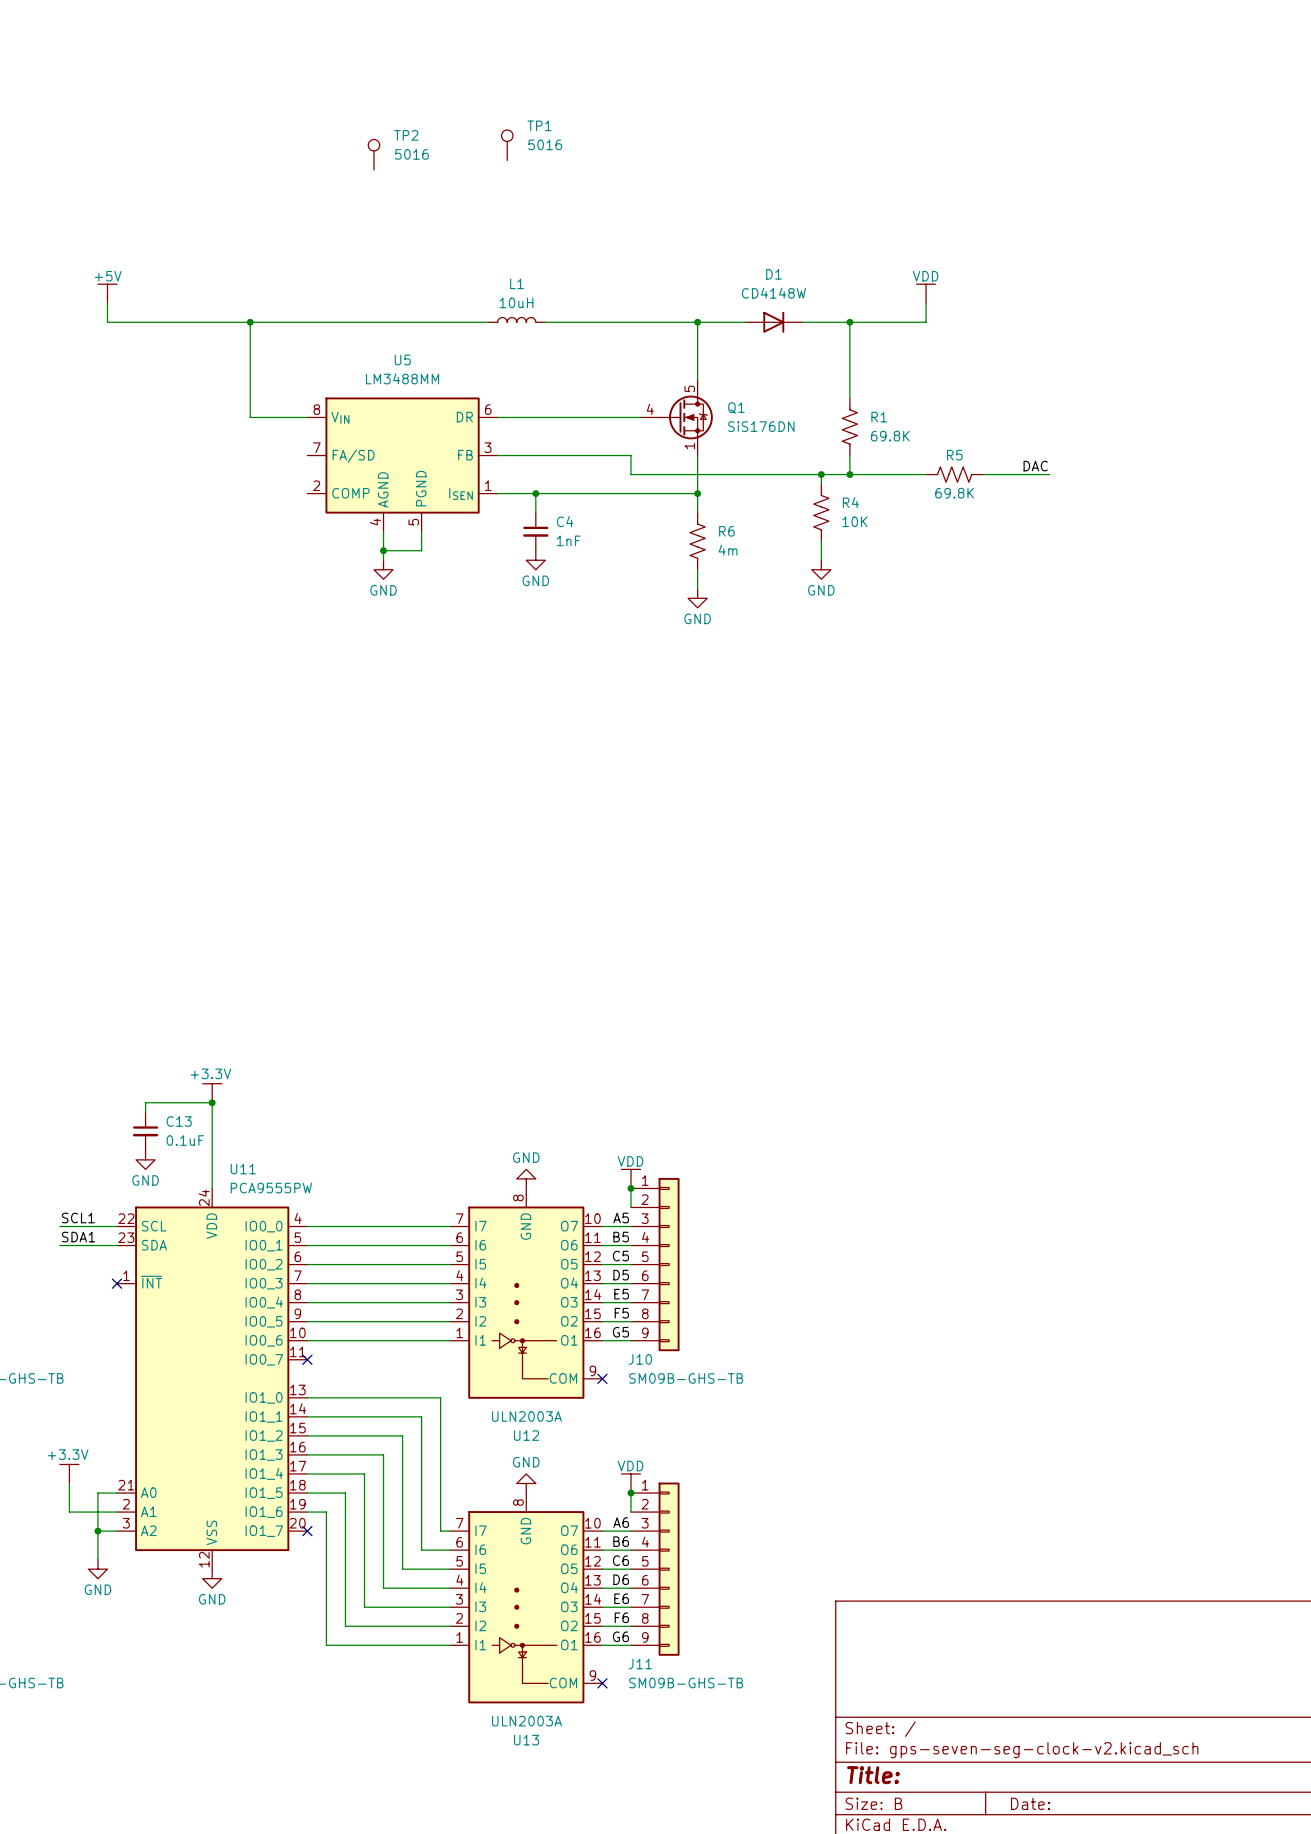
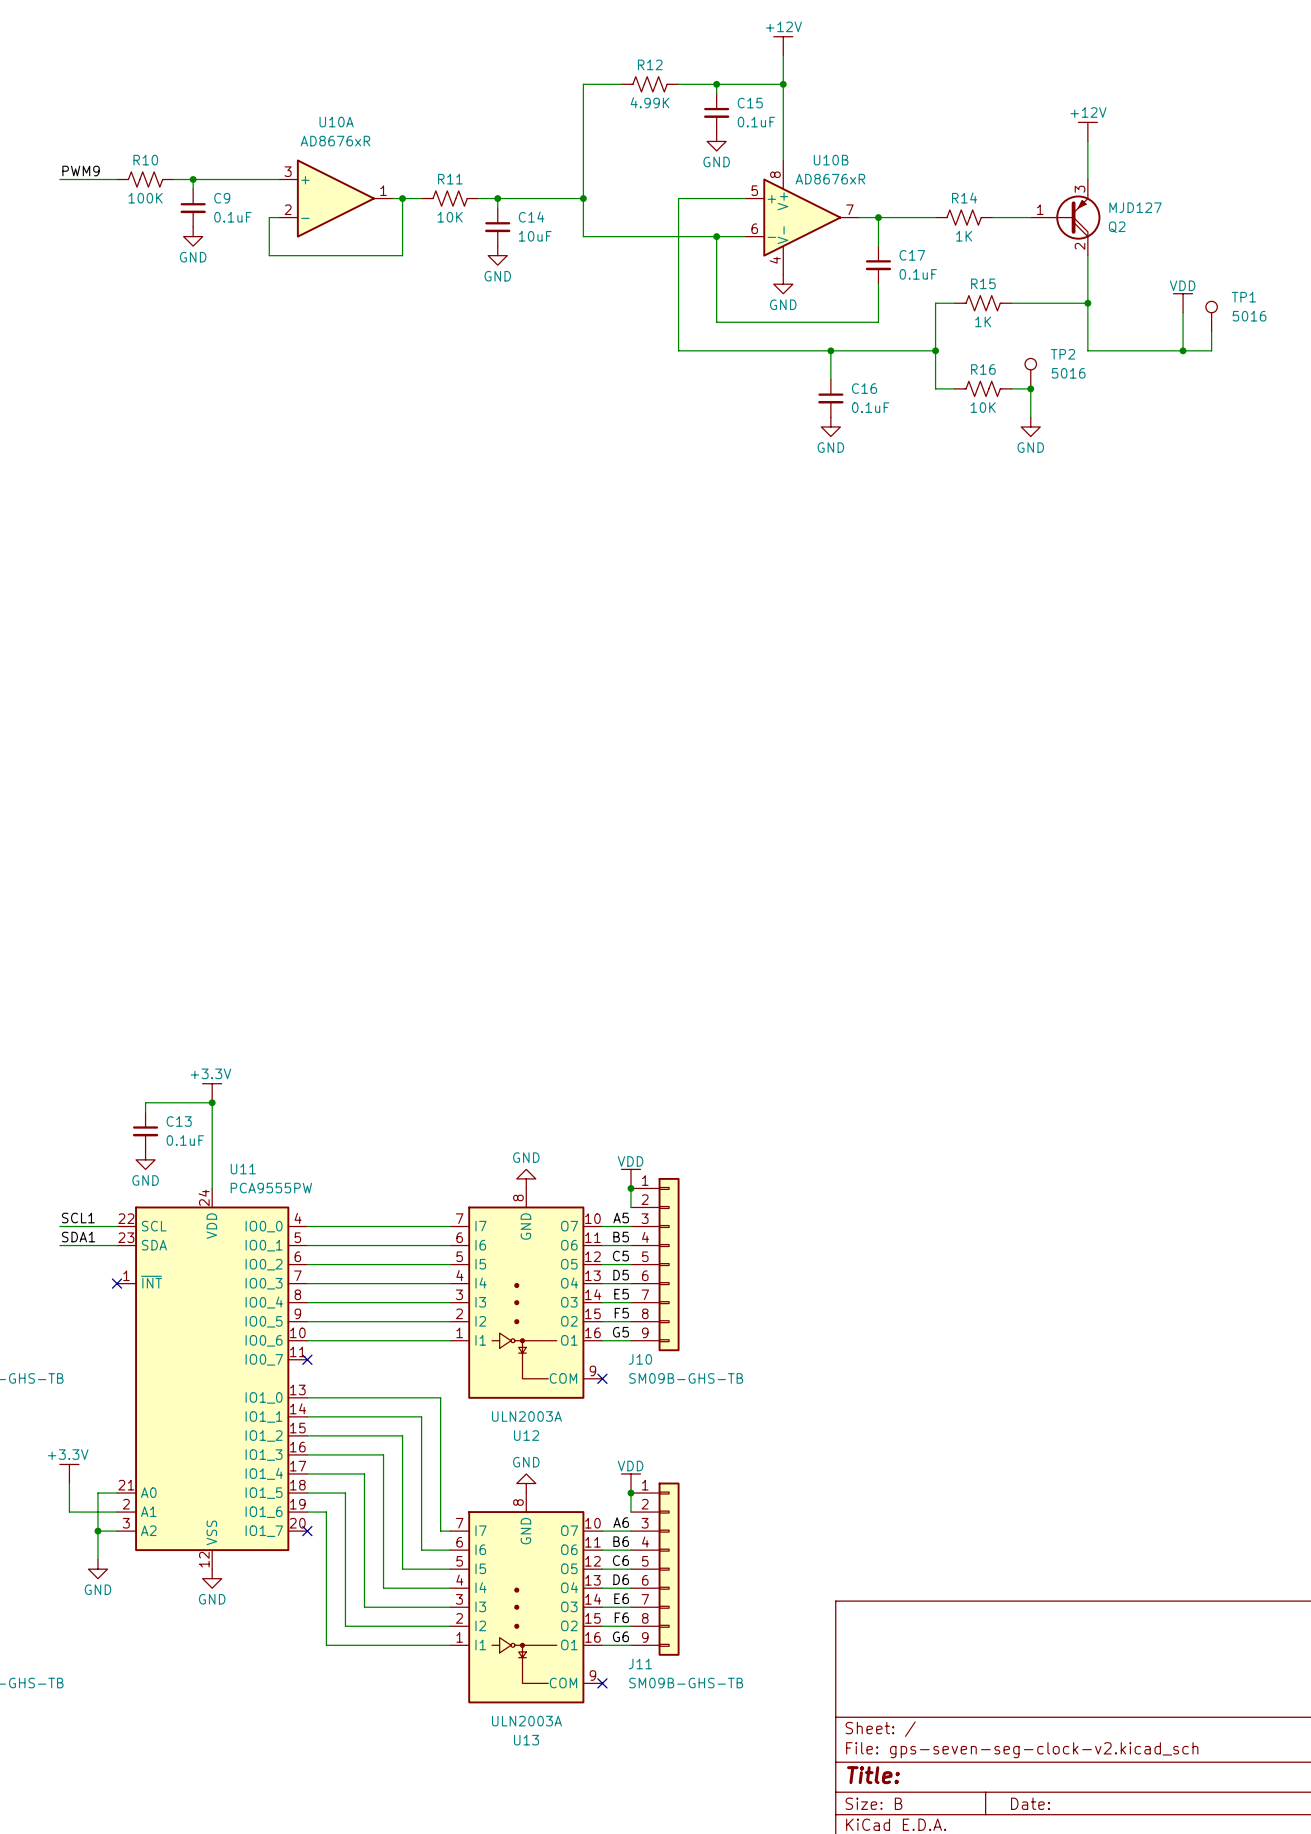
power symbol: none -> +12V (783, 46)
wire: none -> (783, 55) (783, 160)
wire: none -> (621, 84) (583, 84) (583, 236) (745, 236)
R12: none -> 4.99K (650, 84)
wire: none -> (678, 84) (783, 84)
wire: none -> (716, 84) (716, 93)
junction: none -> (716, 84)
junction: none -> (783, 84)
C15: none -> 0.1uF (716, 112)
power symbol: none -> +12V (1087, 131)
power symbol: none -> GND (716, 141)
wire: none -> (1087, 141) (1087, 179)
TP1 position: (507, 145) -> (1211, 316)
TP2 position: (374, 154) -> (1030, 373)
label: none -> PWM9 (81, 171)
wire: none -> (59, 179) (117, 179)
R10: none -> 100K (145, 179)
wire: none -> (174, 179) (278, 179)
wire: none -> (193, 179) (193, 189)
junction: none -> (193, 179)
U10A: none -> AD8676xR (335, 198)
wire: none -> (393, 198) (421, 198)
wire: none -> (402, 198) (402, 255) (269, 255) (269, 217) (278, 217)
junction: none -> (402, 198)
R11: none -> 10K (450, 198)
wire: none -> (478, 198) (583, 198)
wire: none -> (497, 198) (497, 208)
junction: none -> (497, 198)
junction: none -> (583, 198)
wire: none -> (745, 198) (678, 198) (678, 350) (935, 350)
C9: none -> 0.1uF (193, 208)
part: none -> (783, 217)
U10B: none -> AD8676xR (802, 217)
wire: none -> (859, 217) (935, 217)
wire: none -> (878, 217) (878, 246)
junction: none -> (878, 217)
R14: none -> 1K (964, 217)
wire: none -> (992, 217) (1030, 217)
Q2: none -> MJD127 (1065, 217)
C14: none -> 10uF (497, 227)
power symbol: none -> GND (193, 236)
junction: none -> (716, 236)
power symbol: none -> GND (497, 255)
wire: none -> (1087, 255) (1087, 350) (1211, 350) (1211, 331)
C17: none -> 0.1uF (878, 265)
power symbol: none -> GND (783, 284)
power symbol: +5V (107, 293) -> none
power symbol: VDD (926, 293) -> none
wire: (107, 303) (107, 322) (488, 322) -> none
wire: (926, 303) (926, 322) (878, 322) -> (878, 284) (878, 322)
wire: none -> (954, 303) (935, 303) (935, 388) (954, 388)
R15: none -> 1K (983, 303)
wire: none -> (1011, 303) (1087, 303)
junction: none -> (1087, 303)
power symbol: none -> VDD (1183, 303)
wire: none -> (1183, 312) (1183, 350)
L1: 10uH (516, 319) -> none
wire: (250, 322) (250, 417) (307, 417) -> none
junction: (250, 322) -> none
wire: (545, 322) (716, 322) -> (716, 236) (716, 322)
wire: (697, 322) (697, 379) -> none
junction: (697, 322) -> none
D1: CD4148W (773, 322) -> none
wire: (849, 322) (849, 398) -> none
junction position: (849, 322) -> (830, 350)
wire: none -> (830, 350) (830, 379)
junction: none -> (935, 350)
junction: none -> (1183, 350)
R16: none -> 10K (983, 388)
wire: none -> (1011, 388) (1030, 388) (1030, 417)
junction: none -> (1030, 388)
C16: none -> 0.1uF (830, 398)
wire: (497, 417) (640, 417) -> none
Q1: SiS176DN (676, 417) -> none
power symbol: none -> GND (830, 426)
R1: 69.8K (849, 426) -> none
power symbol: none -> GND (1030, 426)
wire: (497, 455) (630, 455) (630, 474) (926, 474) -> none
wire: (697, 455) (697, 512) -> none
wire: (849, 455) (849, 474) -> none
U5: LM3488MM (402, 464) -> none
label: DAC (1035, 466) -> none
wire: (821, 474) (821, 484) -> none
junction: (821, 474) -> none
junction: (849, 474) -> none
R5: 69.8K (954, 474) -> none
wire: (983, 474) (1049, 474) -> none
wire: (497, 493) (697, 493) -> none
wire: (535, 493) (535, 512) -> none
junction: (535, 493) -> none
junction: (697, 493) -> none
R4: 10K (821, 512) -> none
wire: (383, 531) (383, 560) -> none
wire: (421, 531) (421, 550) (383, 550) -> none
C4: 1nF (535, 531) -> none
R6: 4m (697, 541) -> none
wire: (821, 541) (821, 560) -> none
junction: (383, 550) -> none
power symbol: GND (535, 560) -> none
power symbol: GND (383, 569) -> none
wire: (697, 569) (697, 588) -> none
power symbol: GND (821, 569) -> none
power symbol: GND (697, 598) -> none

